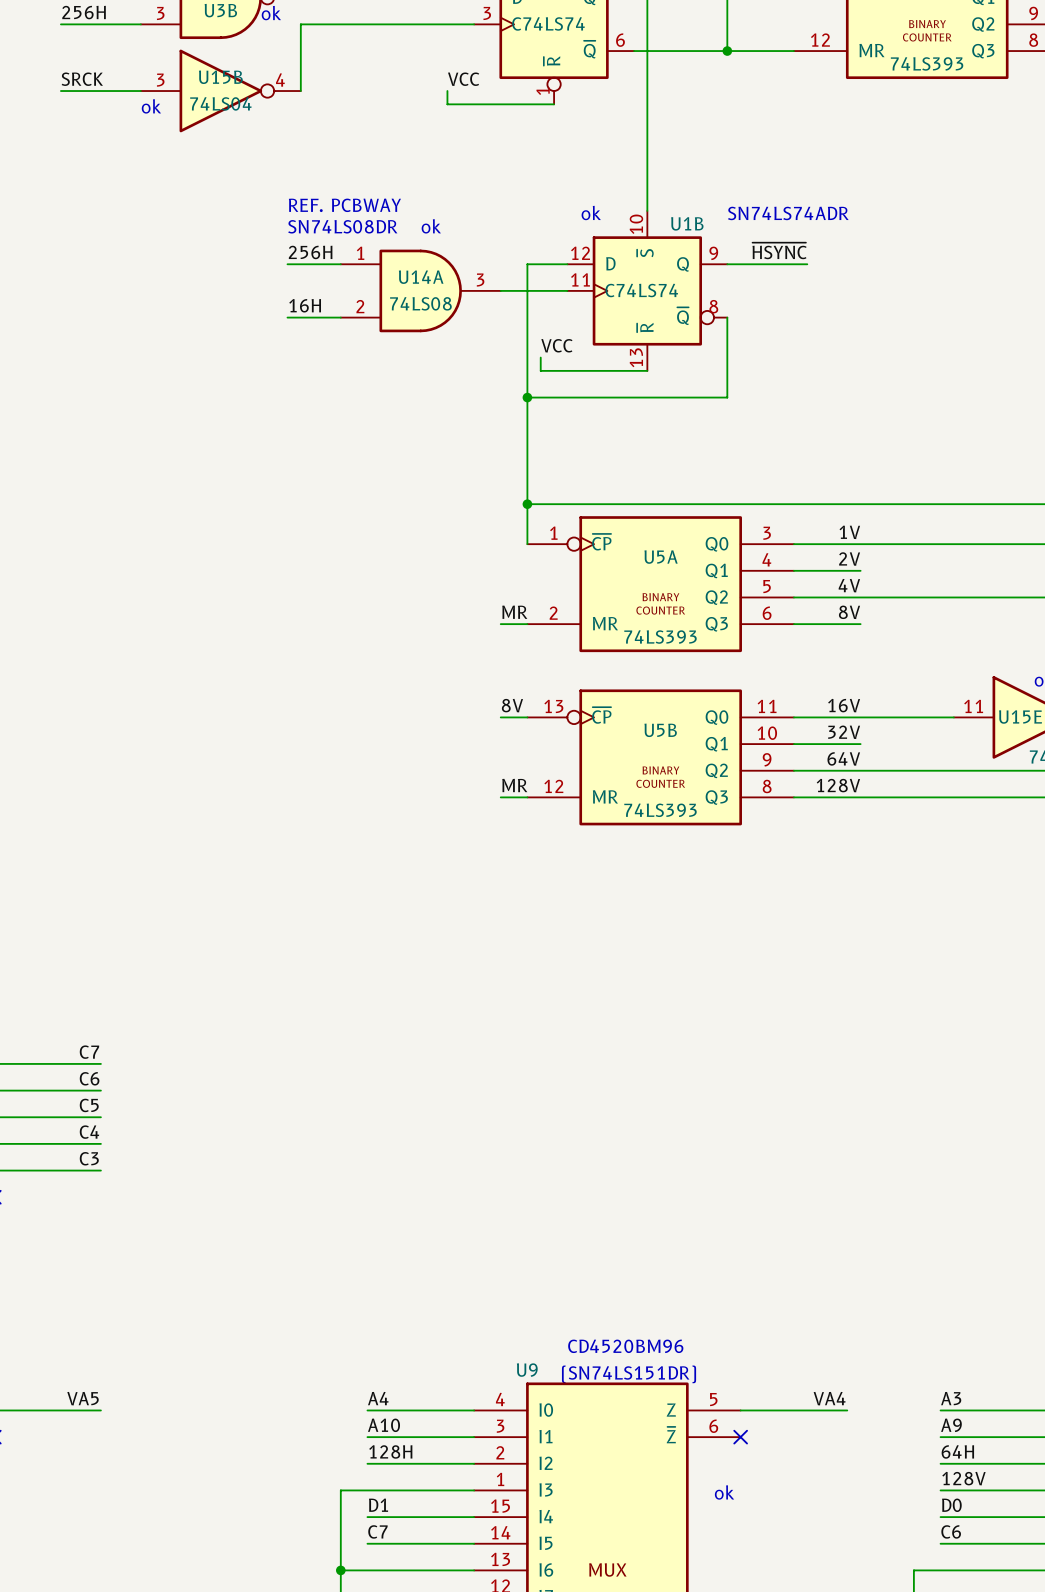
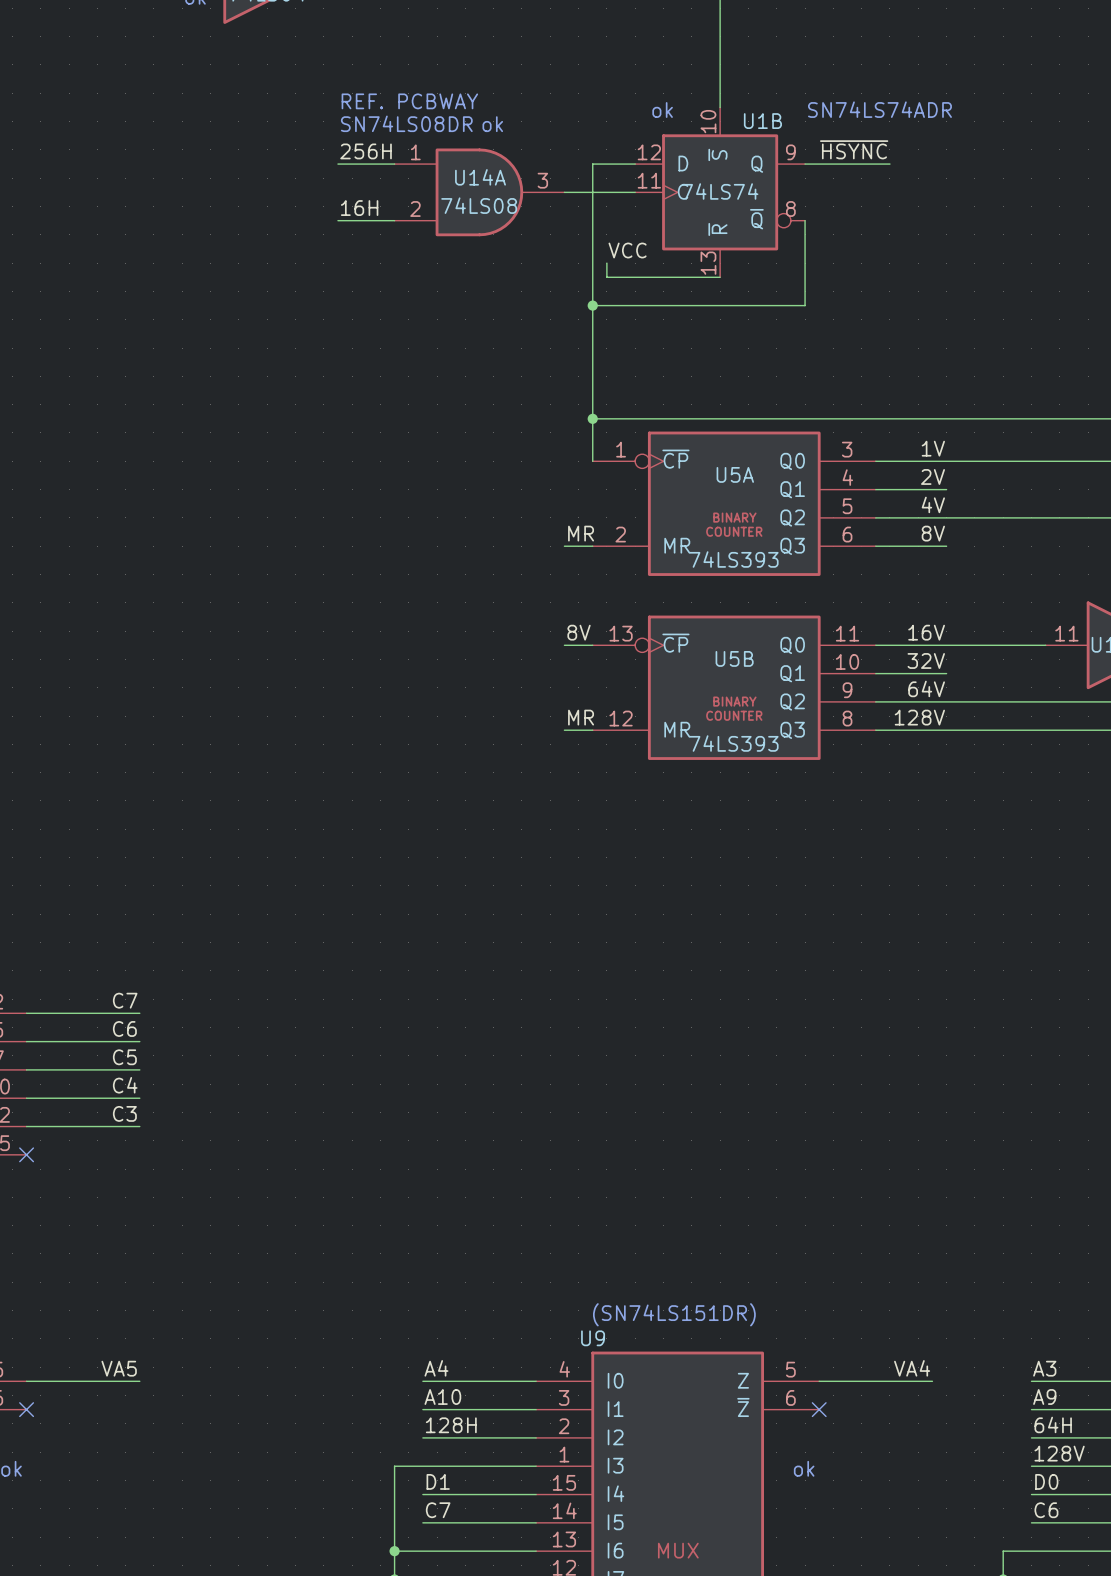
text: CD4520BM96 (625, 1346) -> none
text position: (SN74LS151DR) (629, 1374) -> (SN74LS151DR) (674, 1314)

